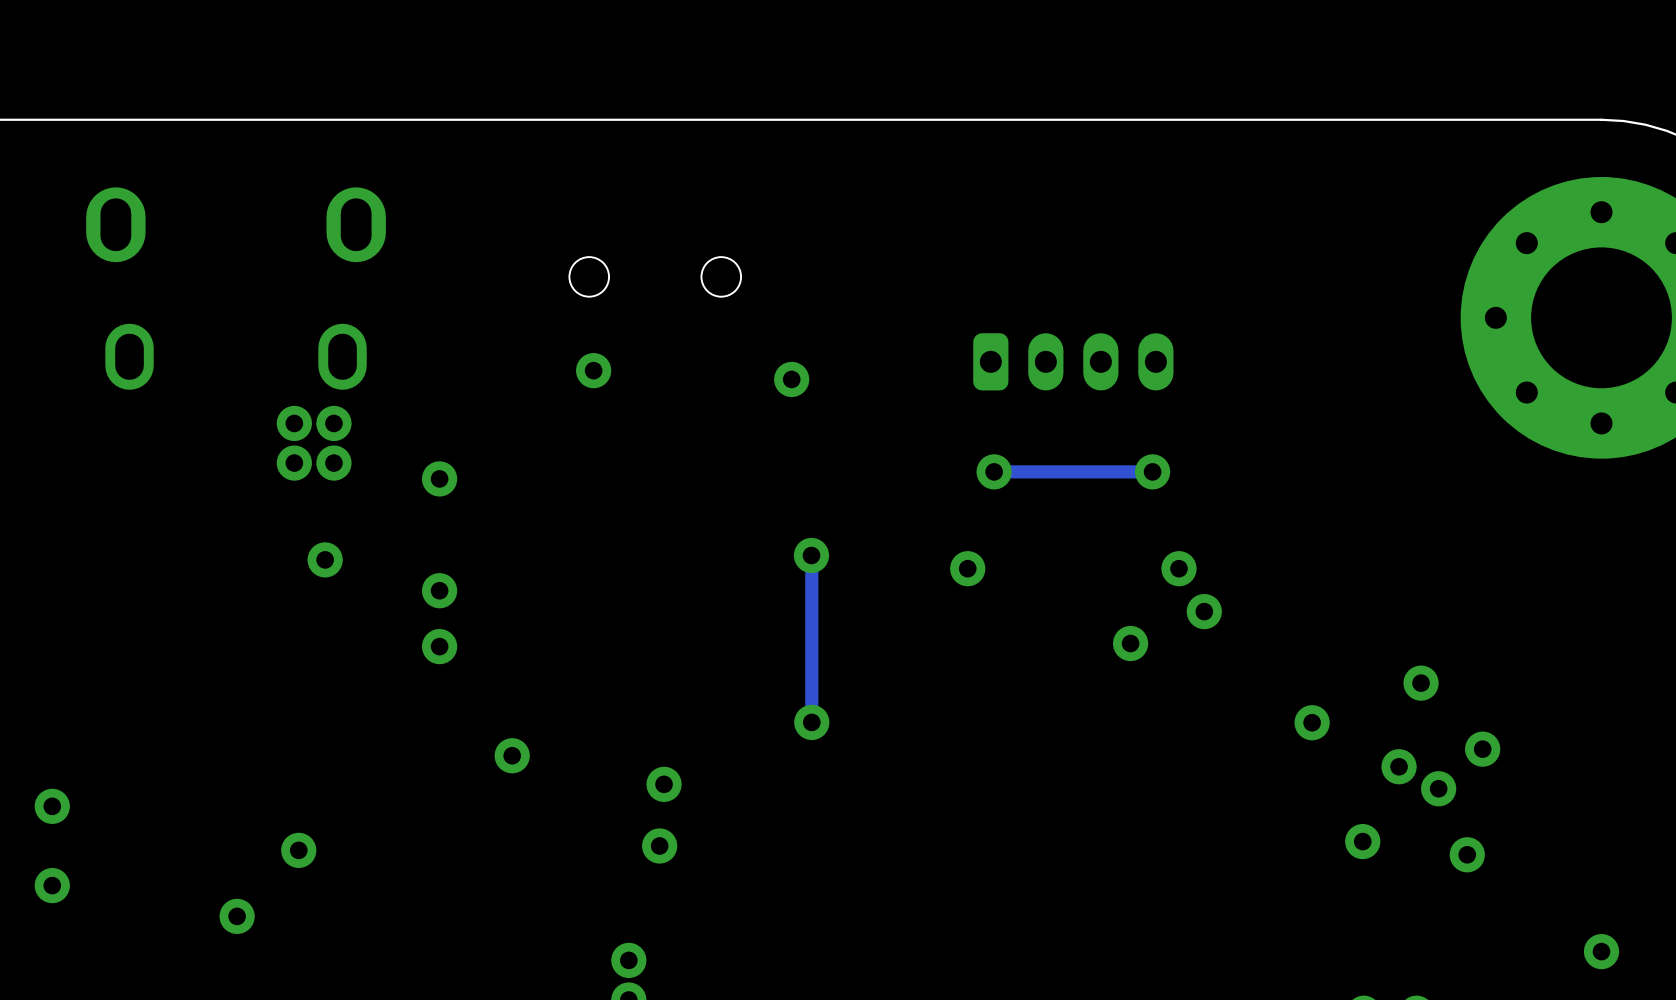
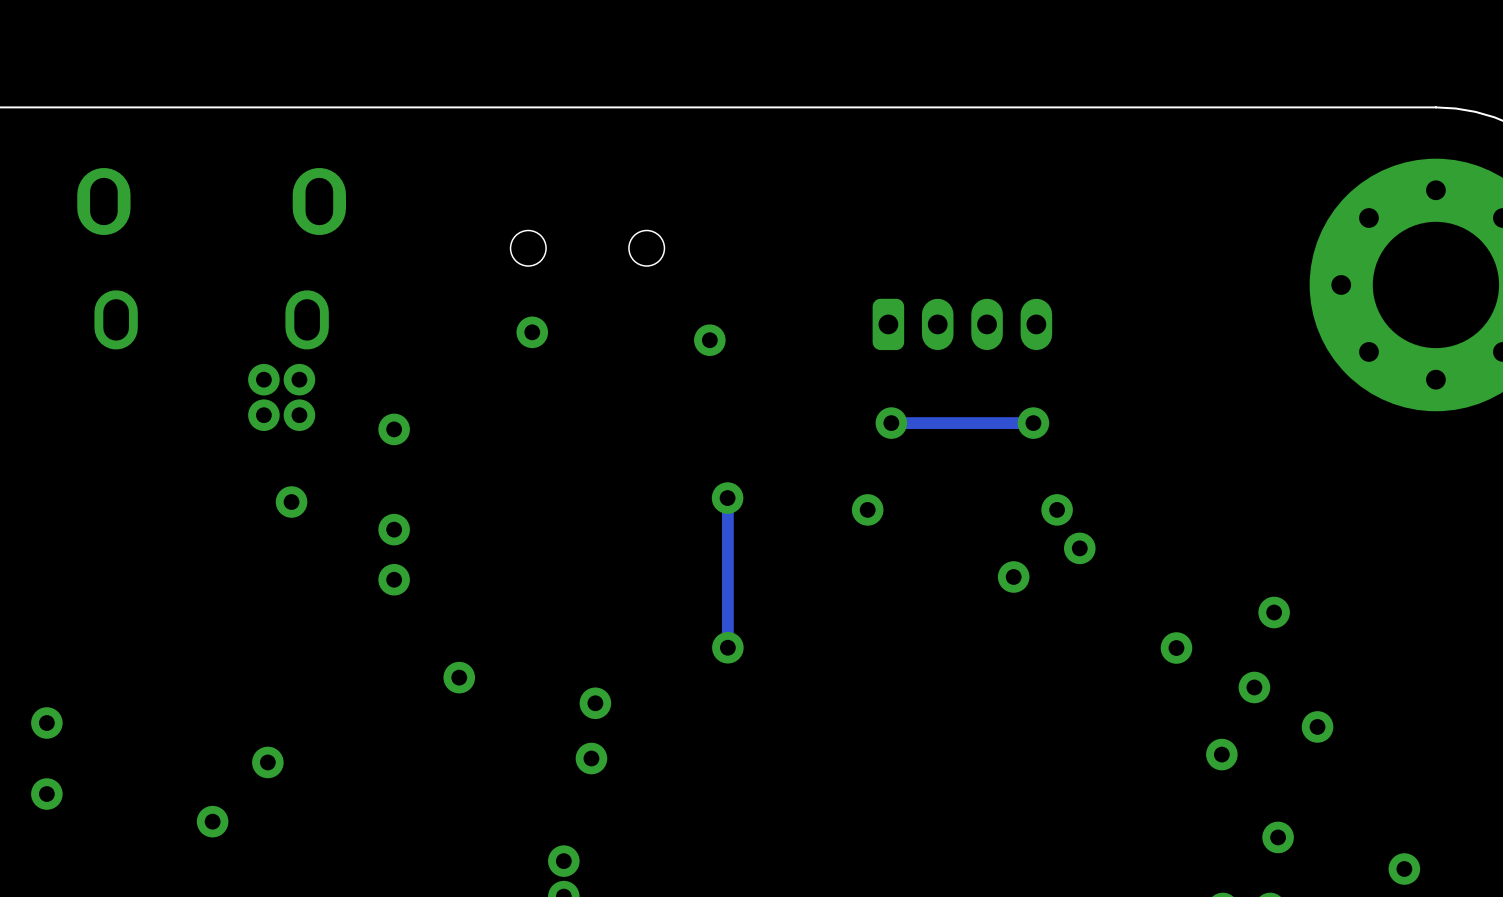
via: (1482, 749) -> none
via position: (1438, 788) -> (1317, 726)
via: (1467, 854) -> none
via: none -> (1278, 837)
via position: (1601, 951) -> (1404, 869)

